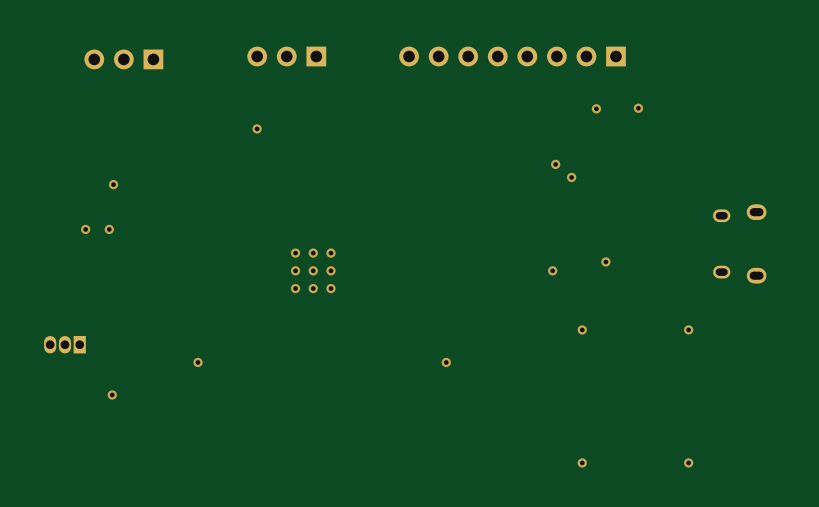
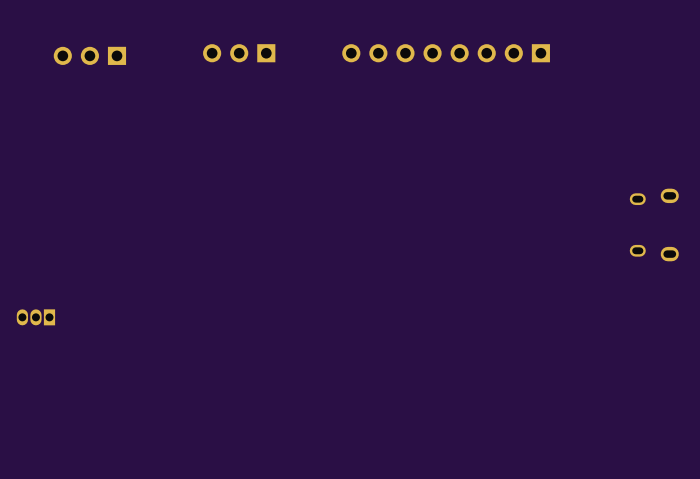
via: (596, 108) -> none
via: (638, 108) -> none
via: (257, 128) -> none
via: (555, 164) -> none
via: (571, 177) -> none
via: (113, 184) -> none
via: (85, 229) -> none
via: (109, 229) -> none
via: (295, 253) -> none
via: (313, 253) -> none
via: (331, 253) -> none
via: (605, 261) -> none
via: (295, 270) -> none
via: (313, 270) -> none
via: (331, 270) -> none
via: (552, 270) -> none
via: (295, 288) -> none
via: (313, 288) -> none
via: (331, 288) -> none
via: (582, 329) -> none
via: (688, 329) -> none
via: (197, 362) -> none
via: (446, 362) -> none
via: (112, 394) -> none
via: (582, 462) -> none
via: (688, 462) -> none

